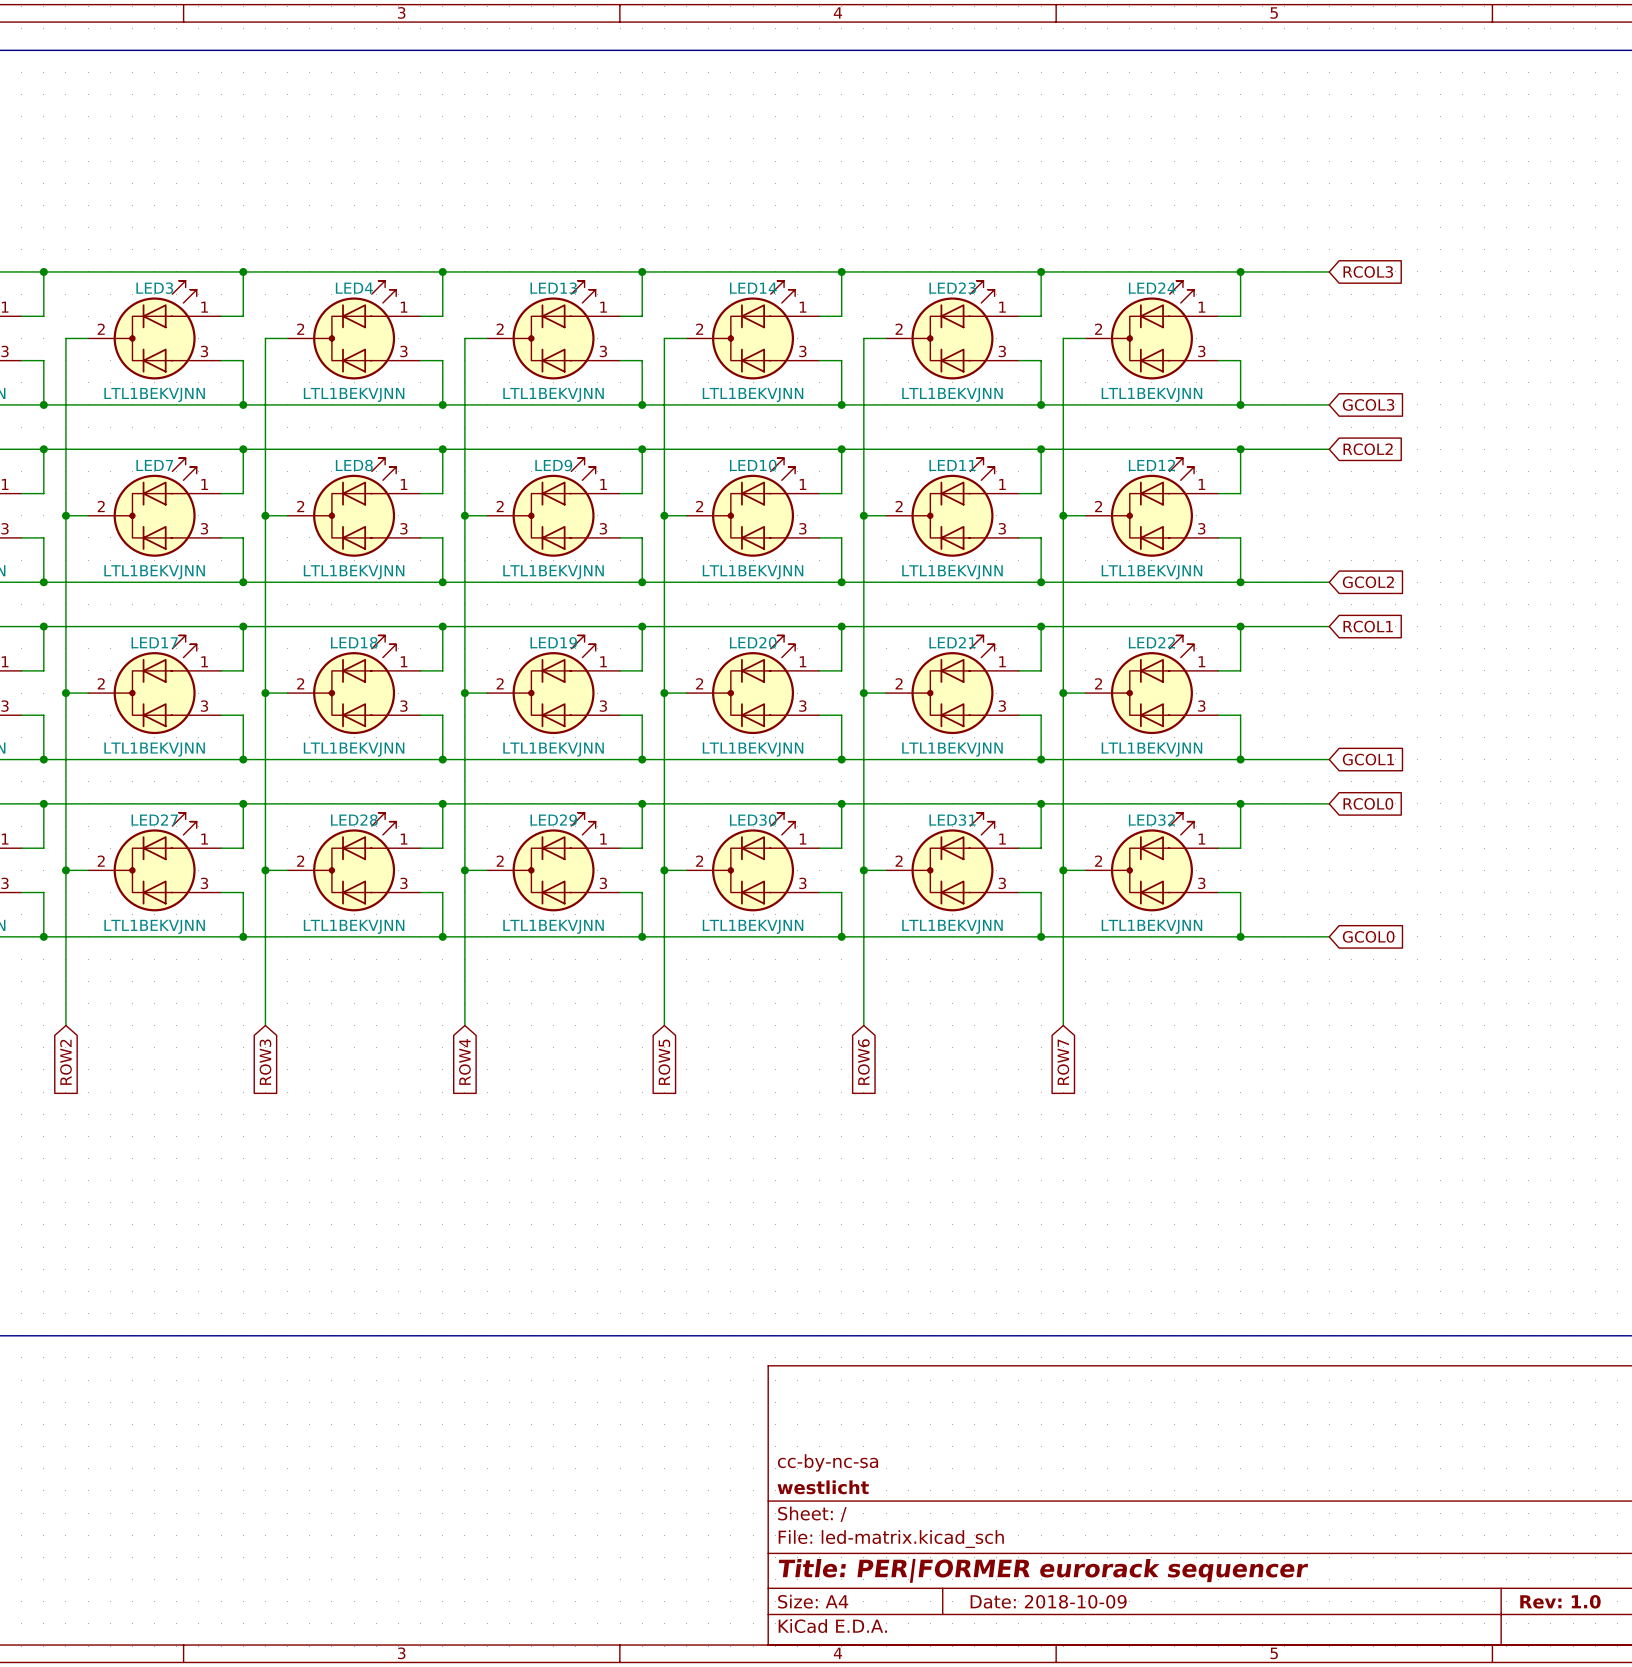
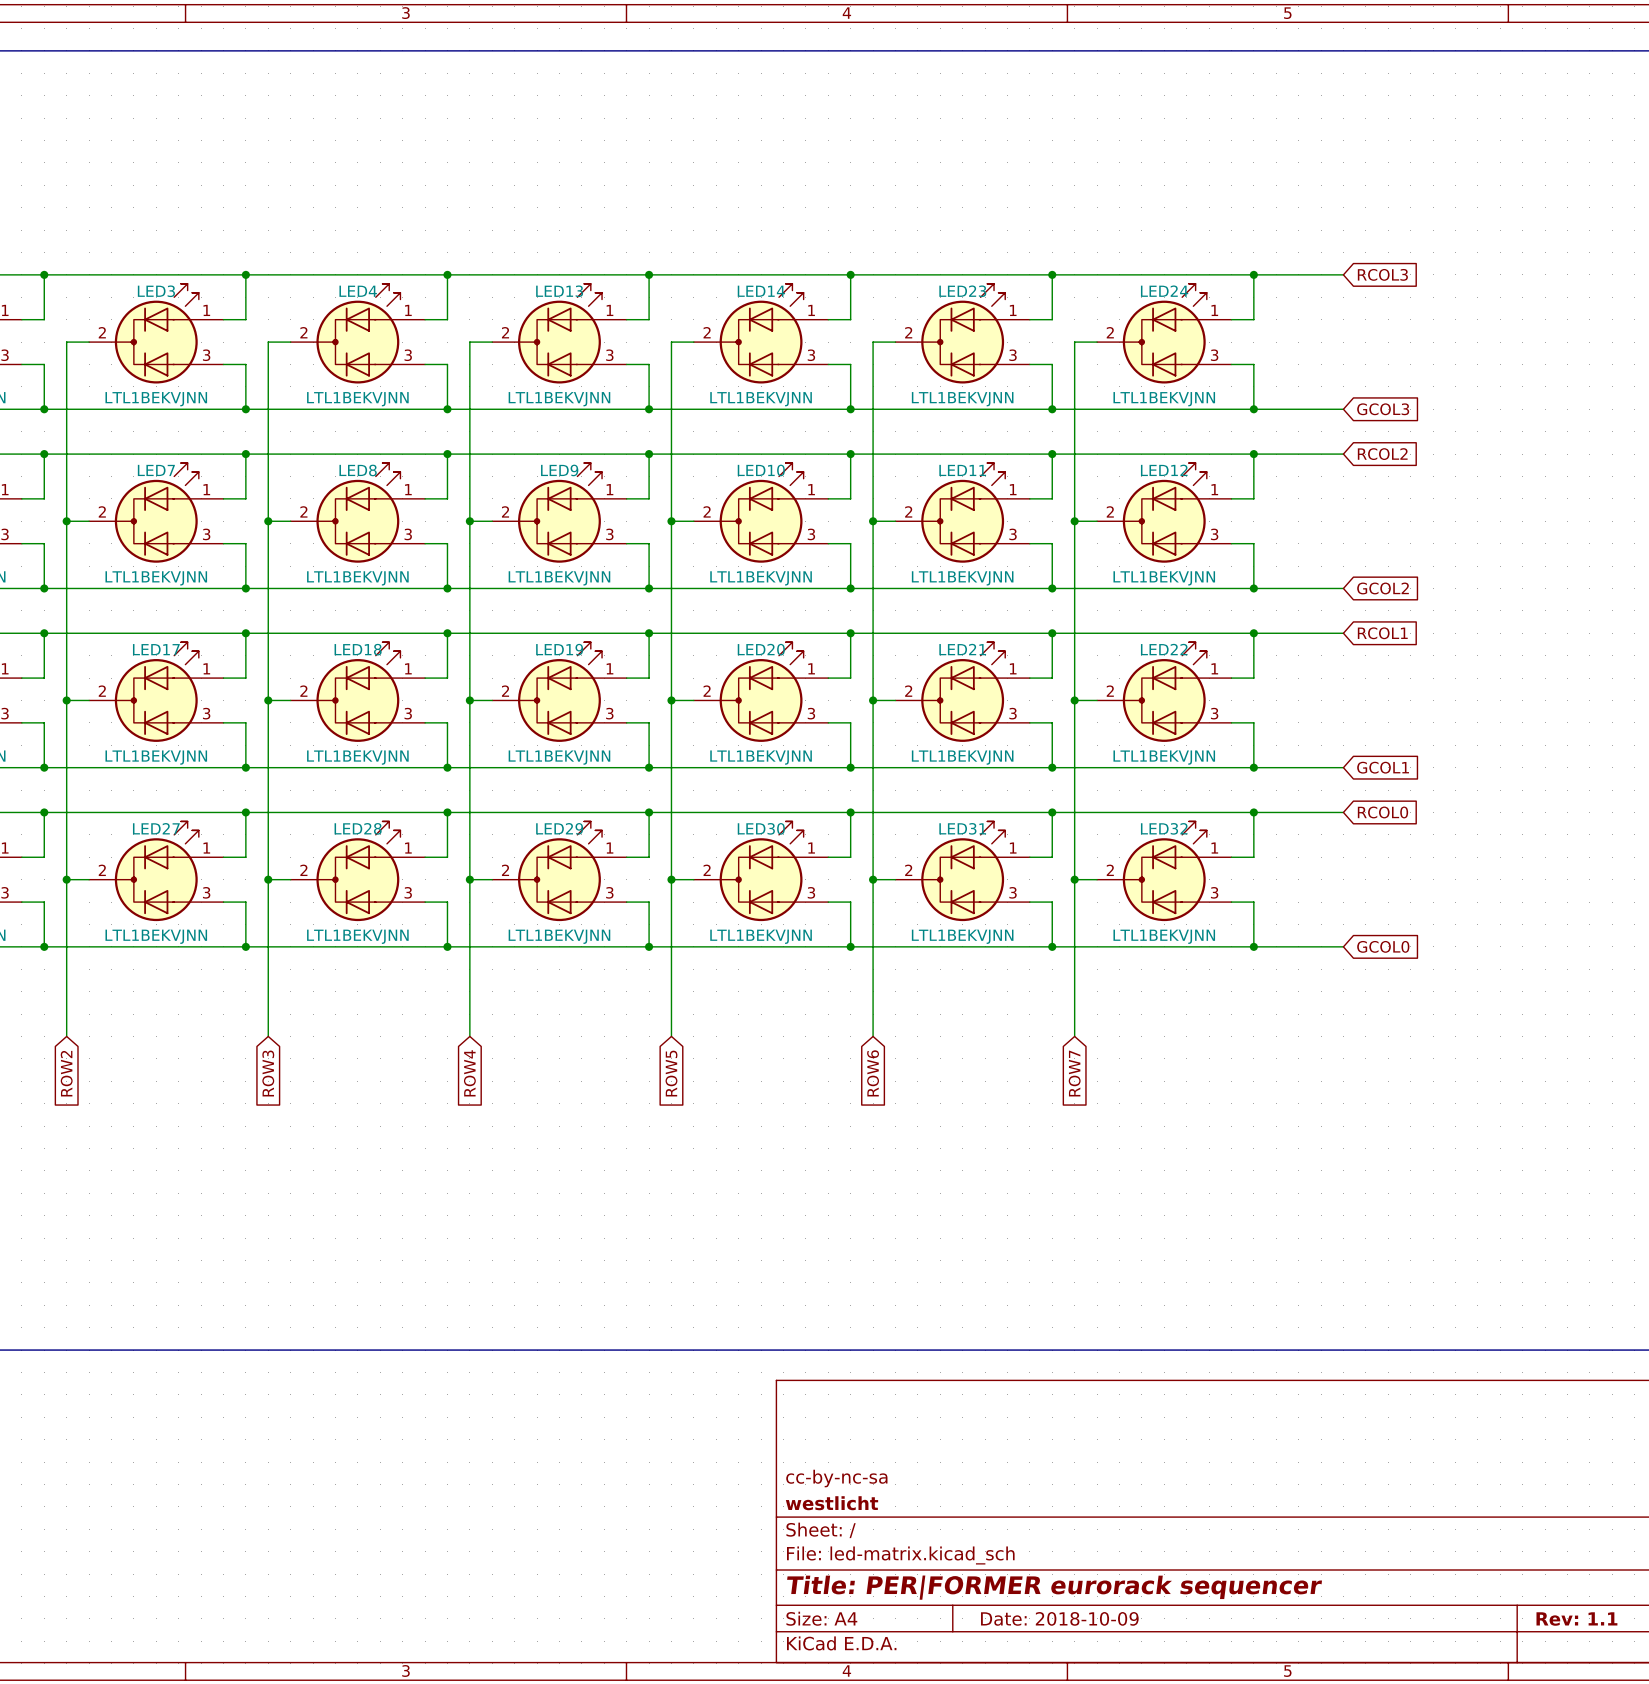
title block: Rev: 1.0 (1560, 1601) -> Rev: 1.1 (1576, 1619)

